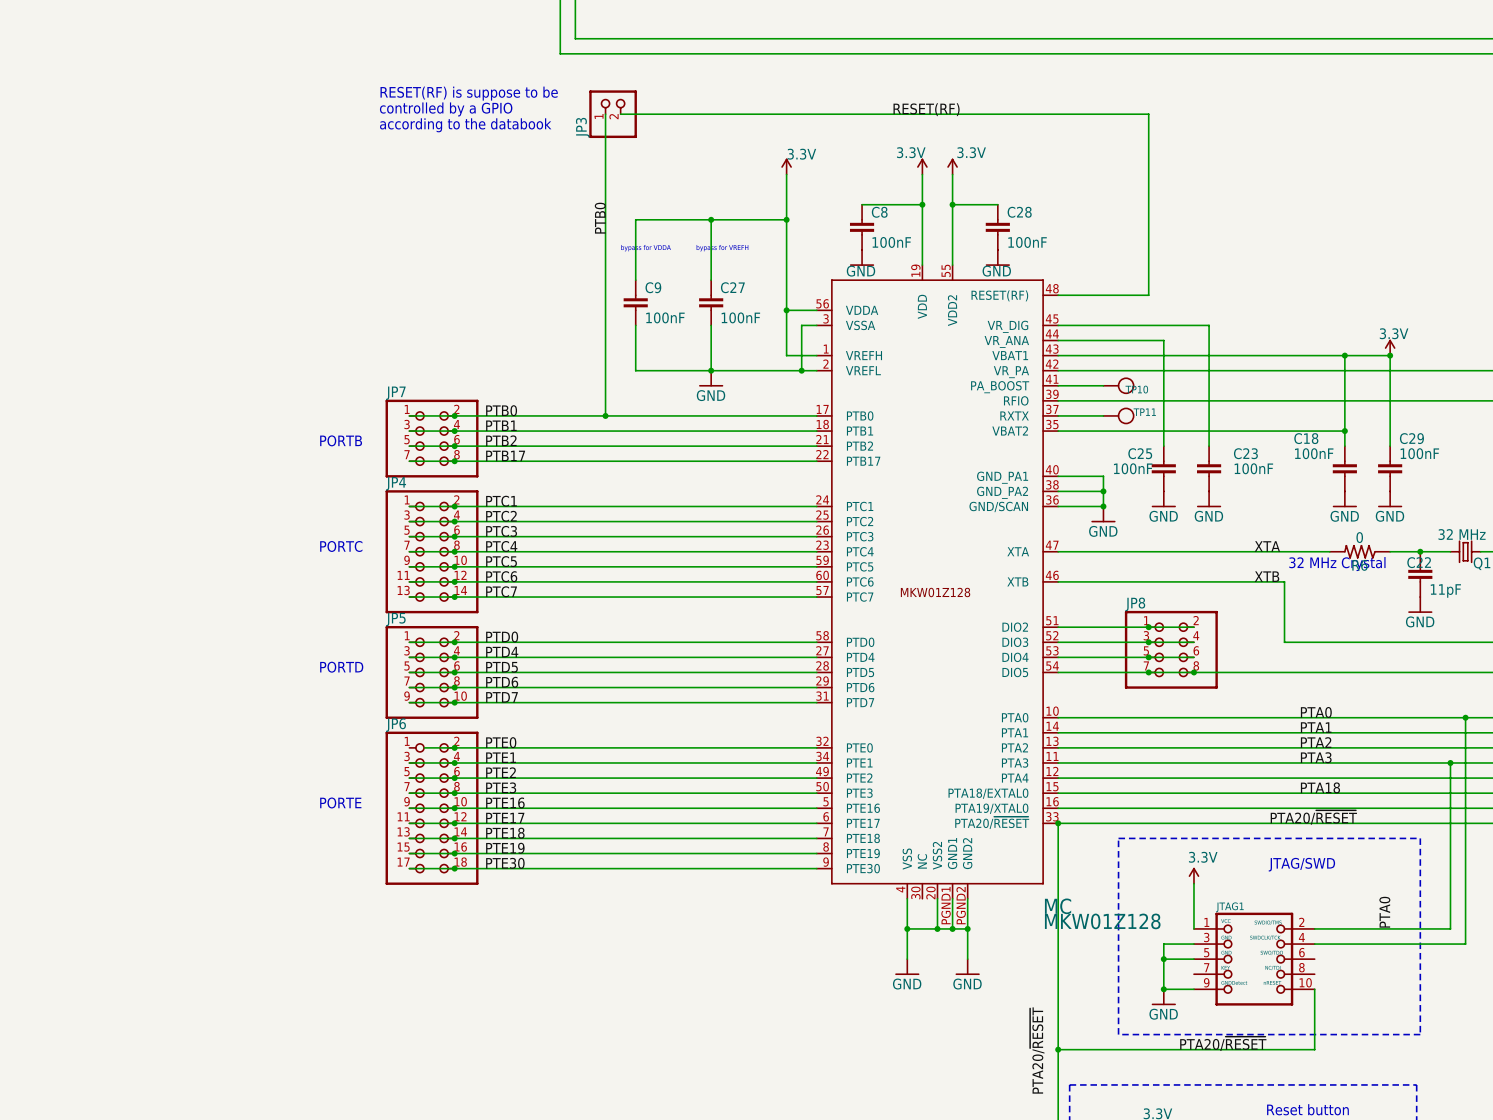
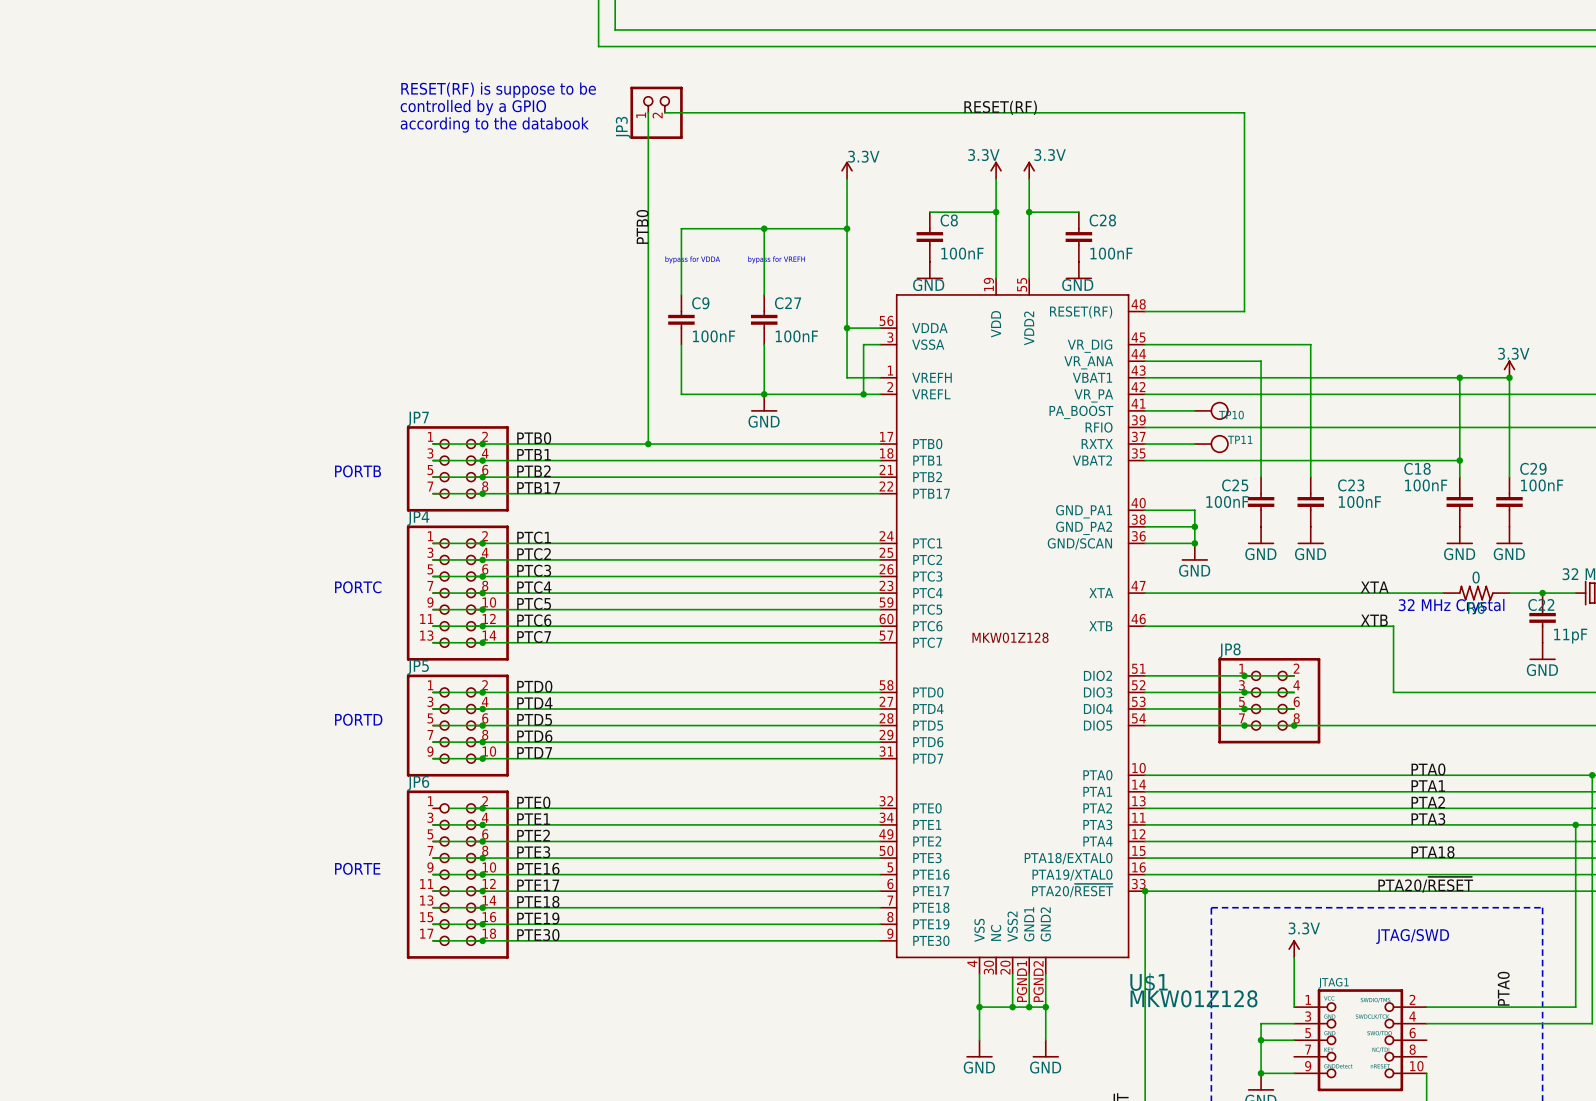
MC name: MC (1058, 906) -> U$1 (1149, 983)

